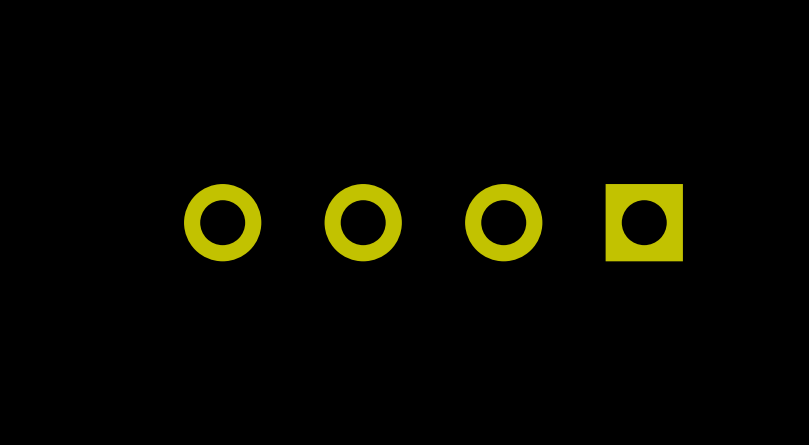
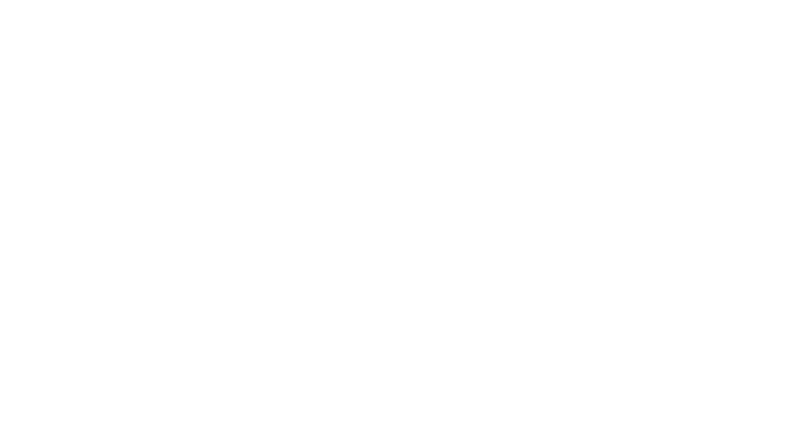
part: (433, 222) -> none

